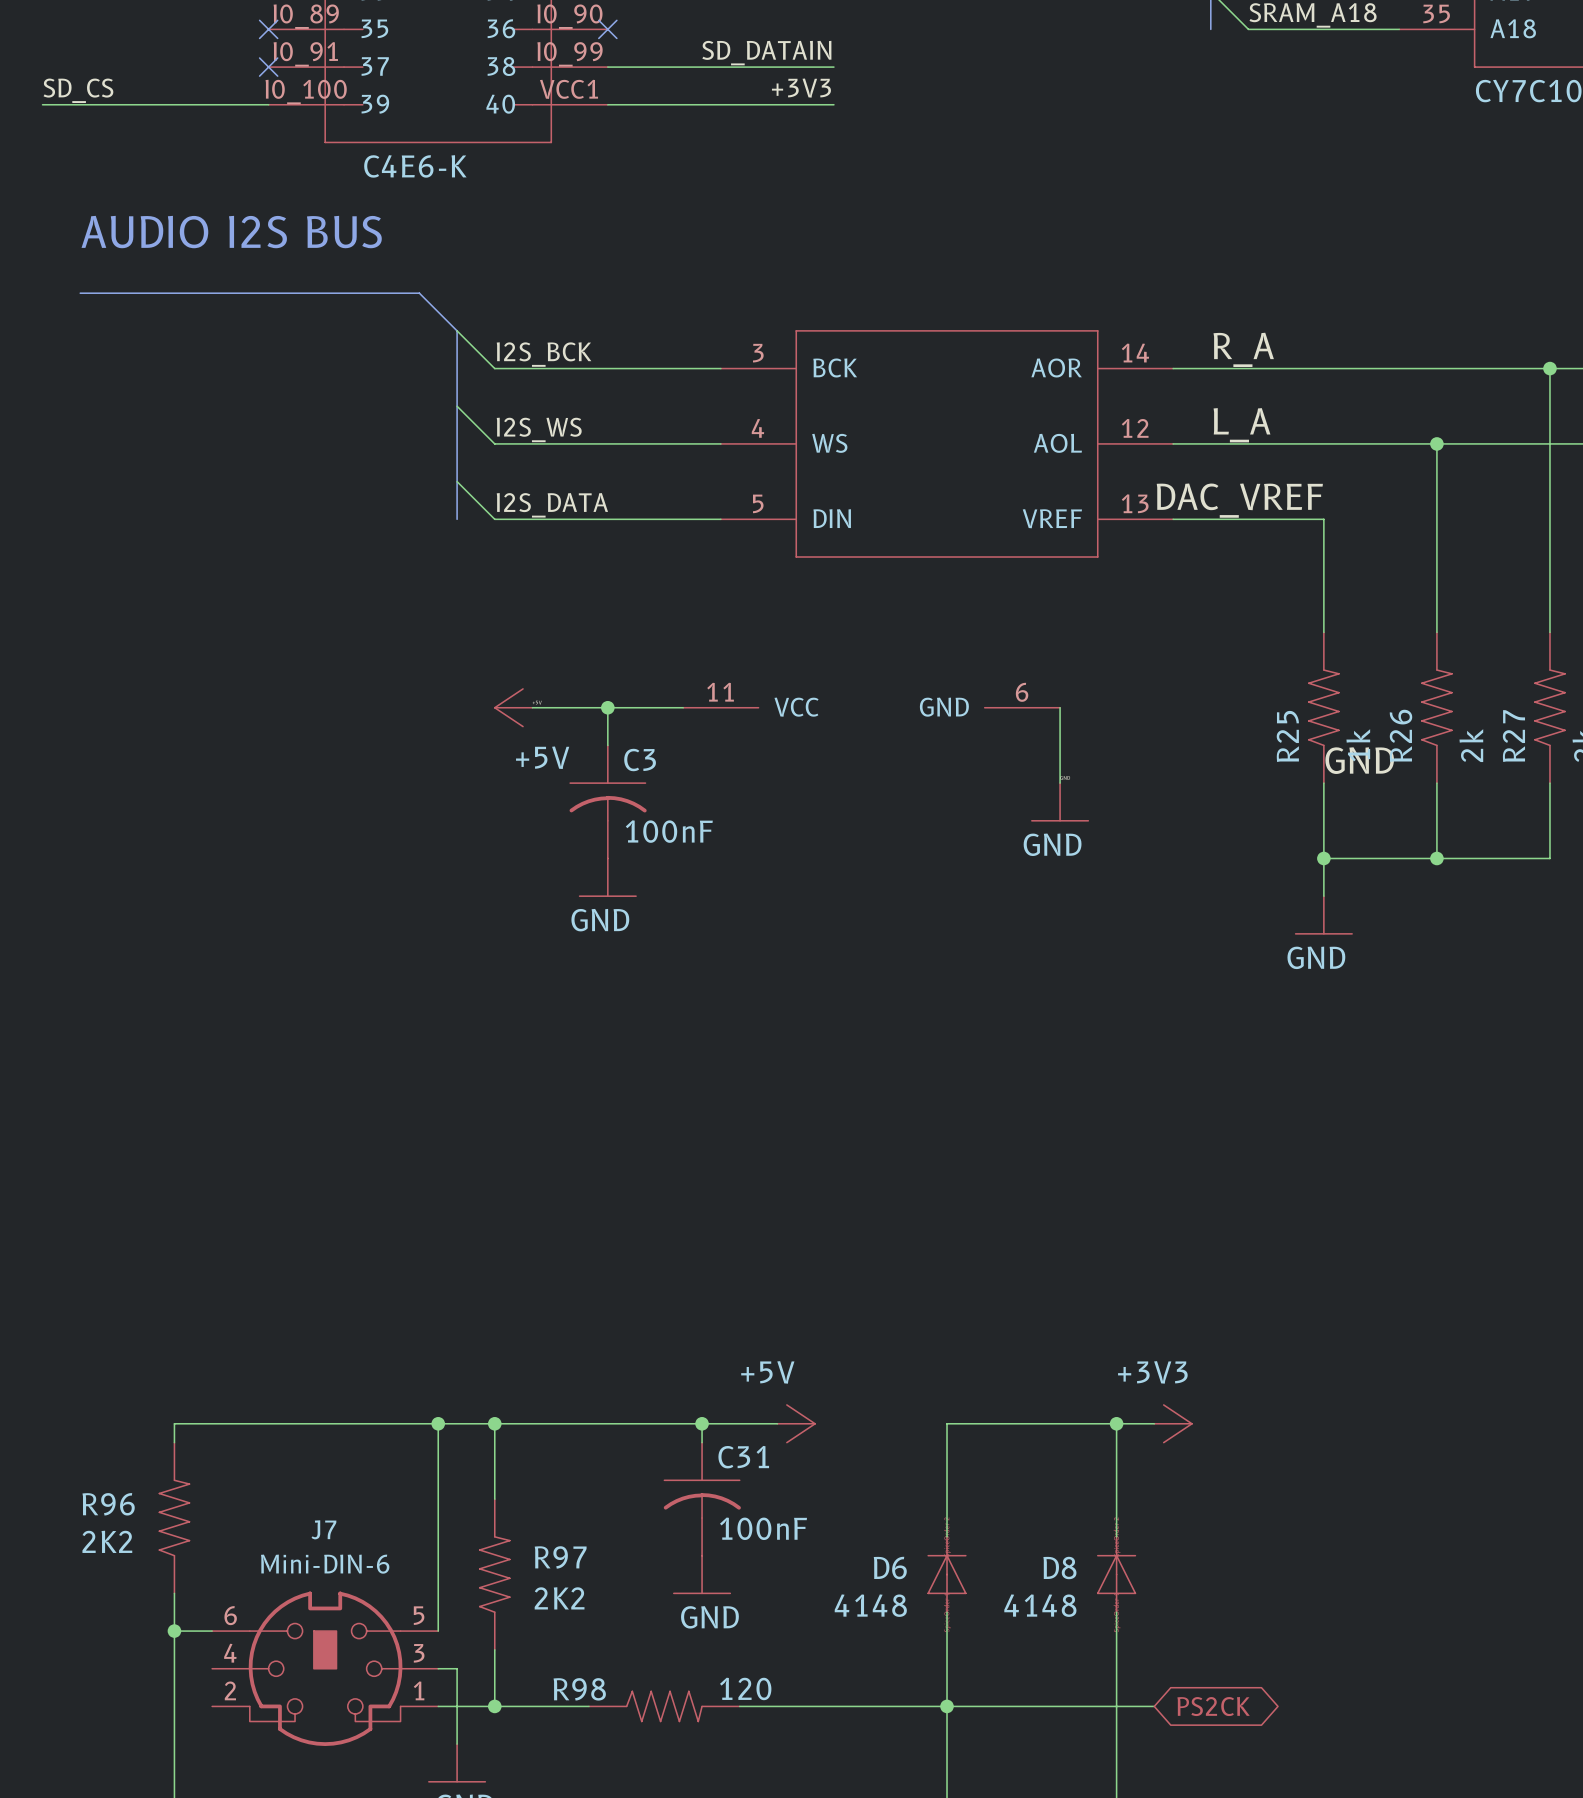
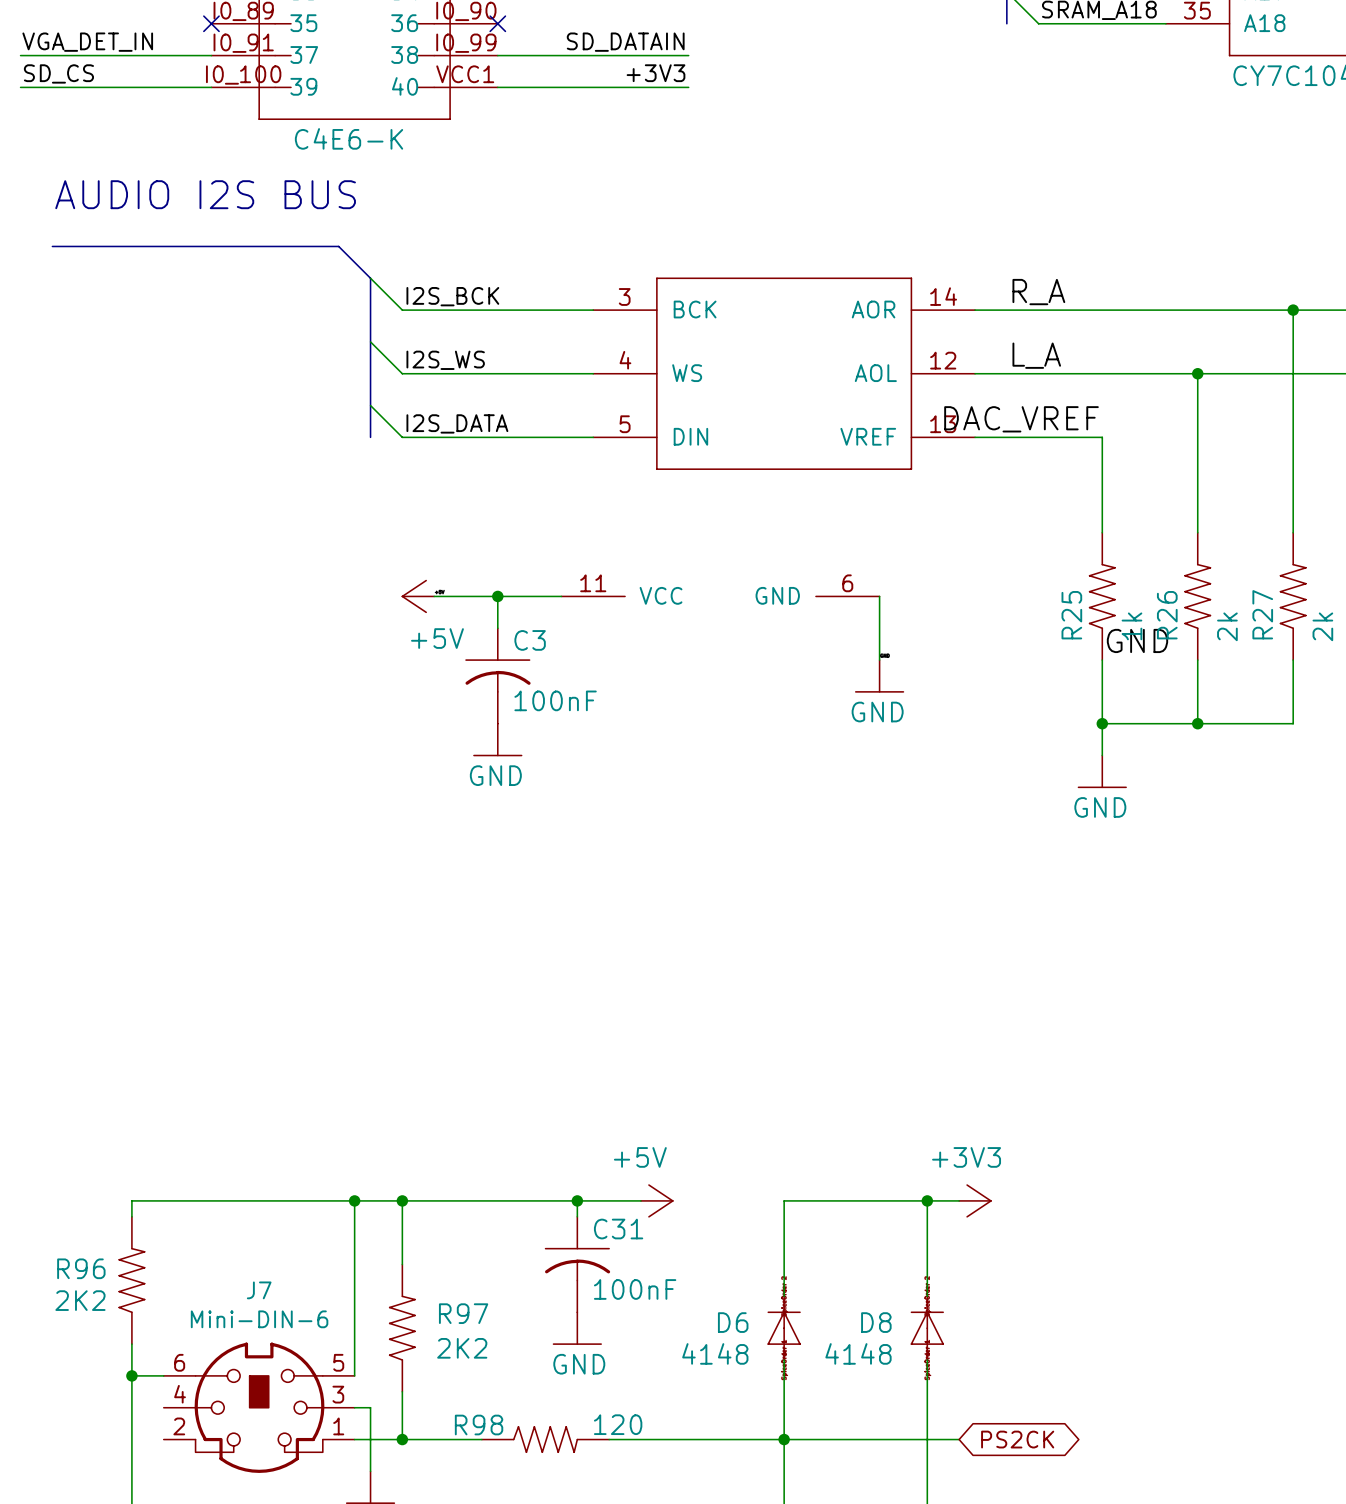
label: none -> VGA_DET_IN (87, 42)
wire: none -> (20, 55) (211, 55)
no-connect mark: (268, 67) -> none

